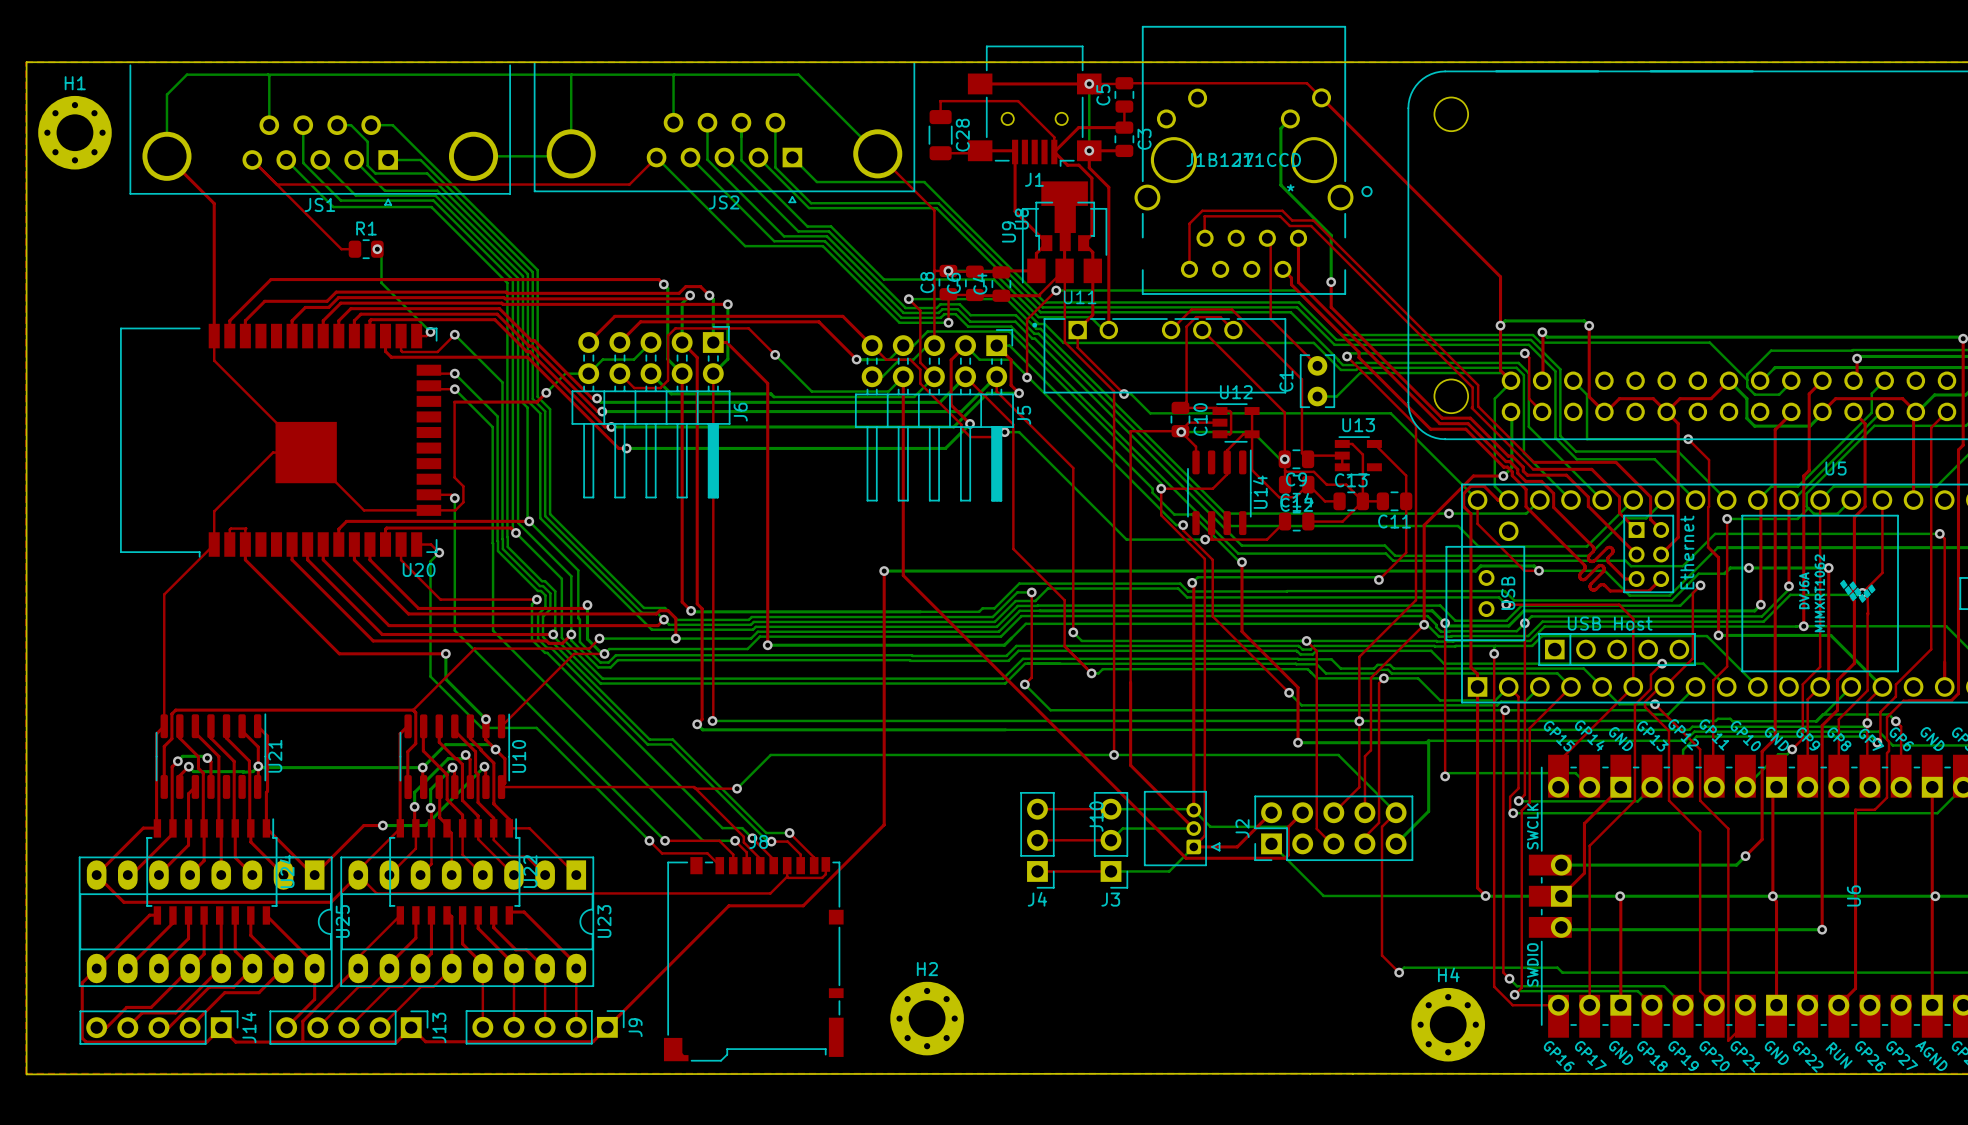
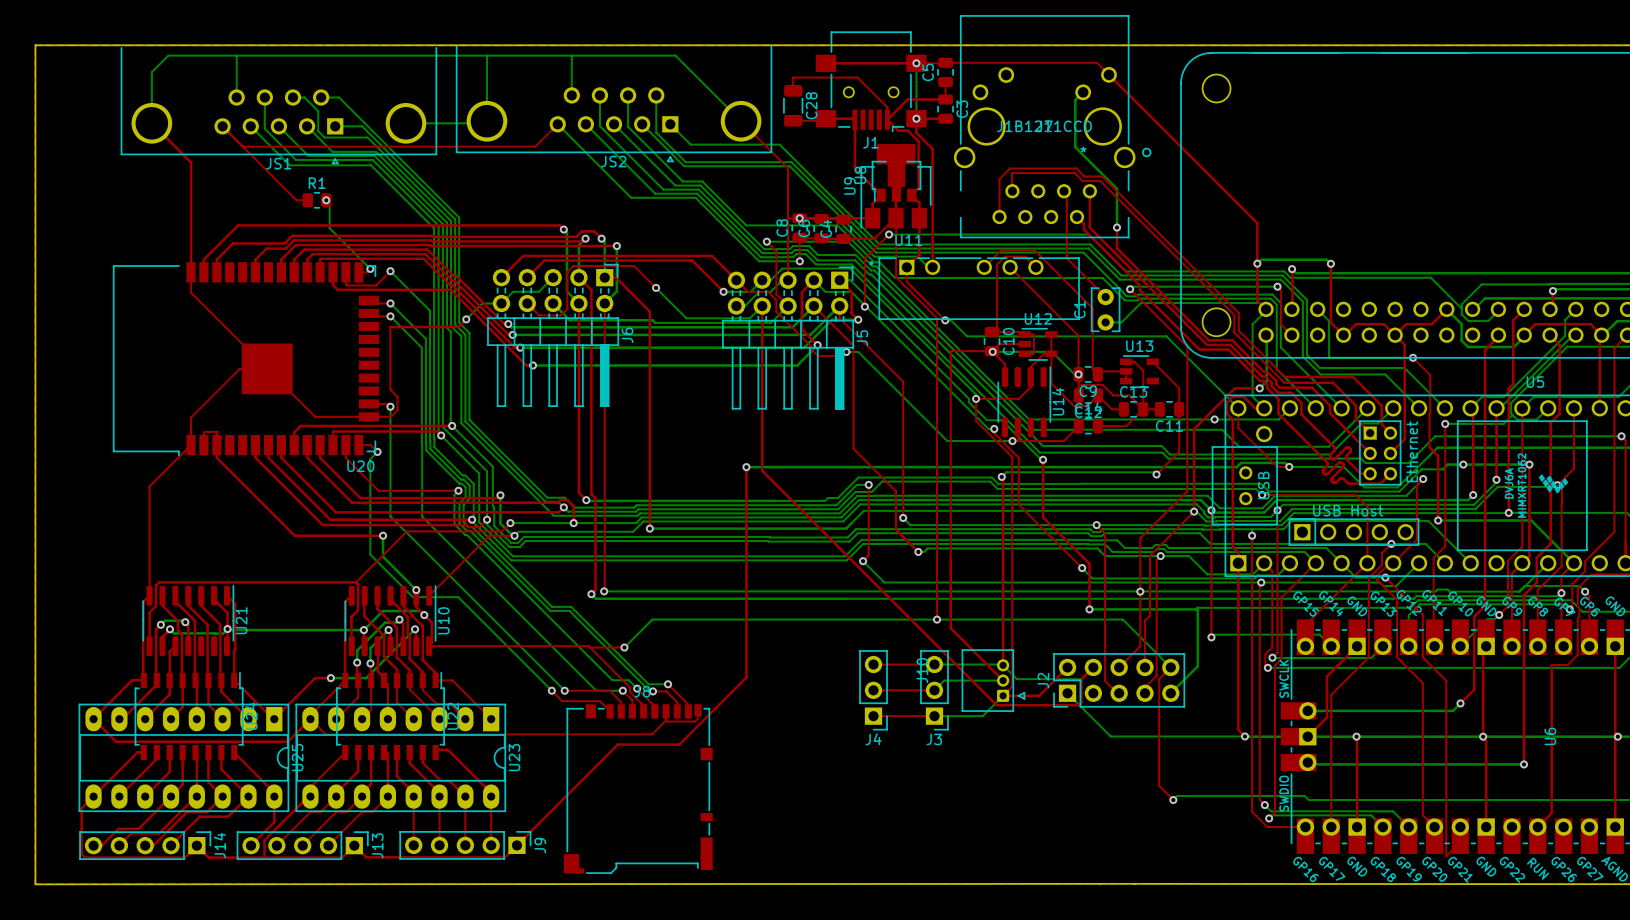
H1: (74, 132) -> none
H2: (927, 1018) -> none
H4: (1448, 1024) -> none

